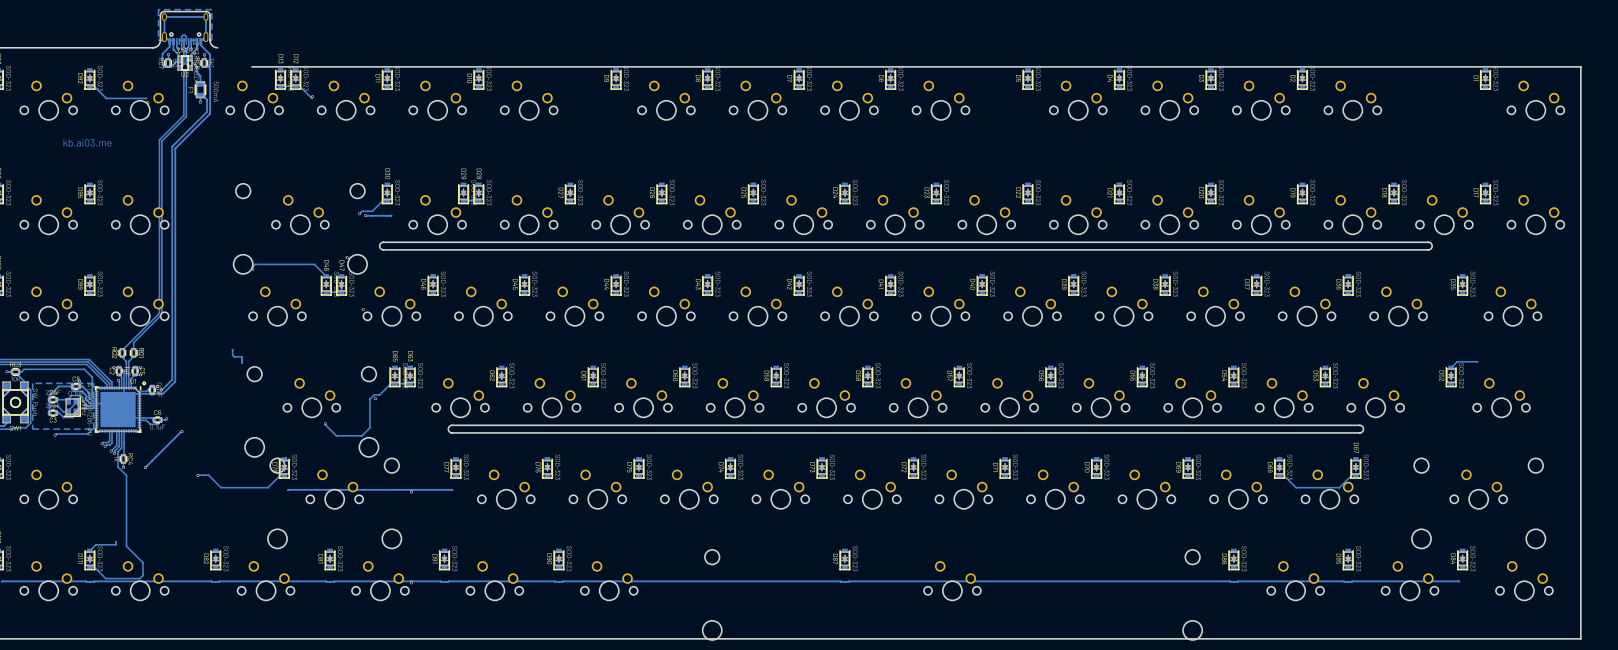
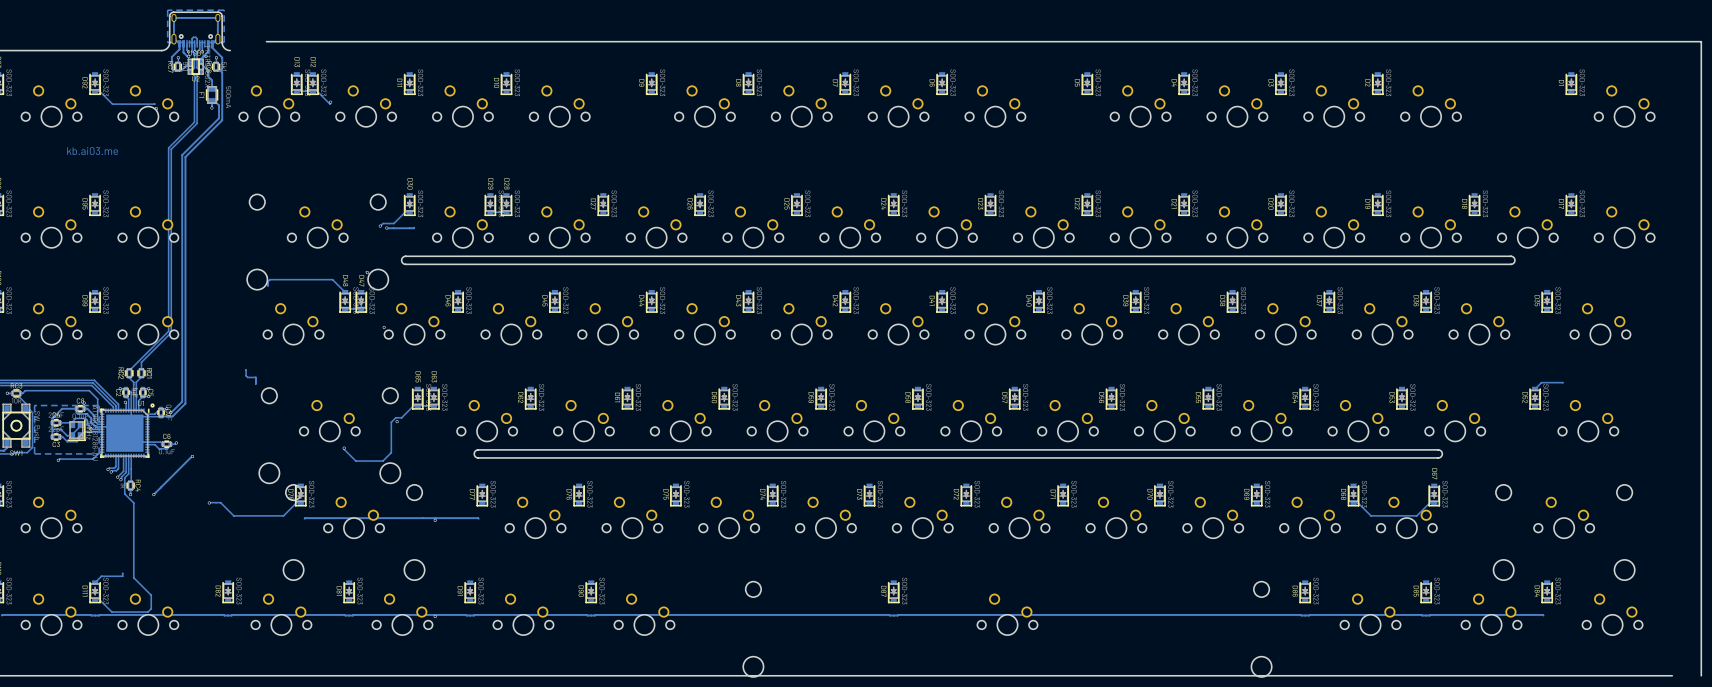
board edge: none -> (266, 41) (1701, 41) (1701, 675)
board edge: (251, 66) (1580, 66) (1580, 638) -> none

